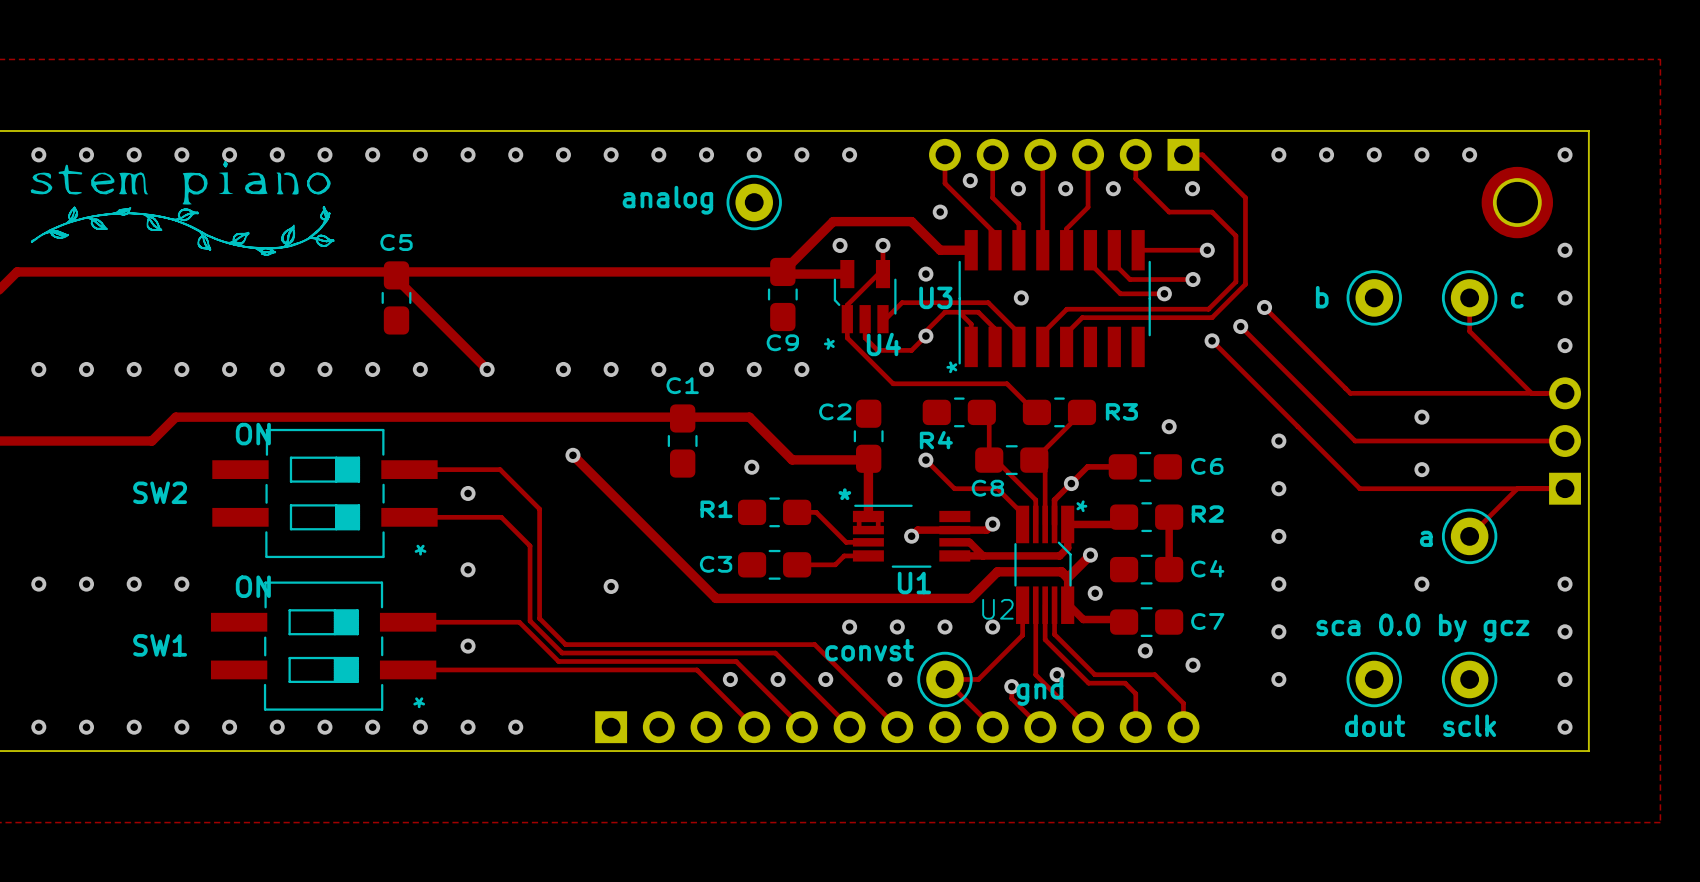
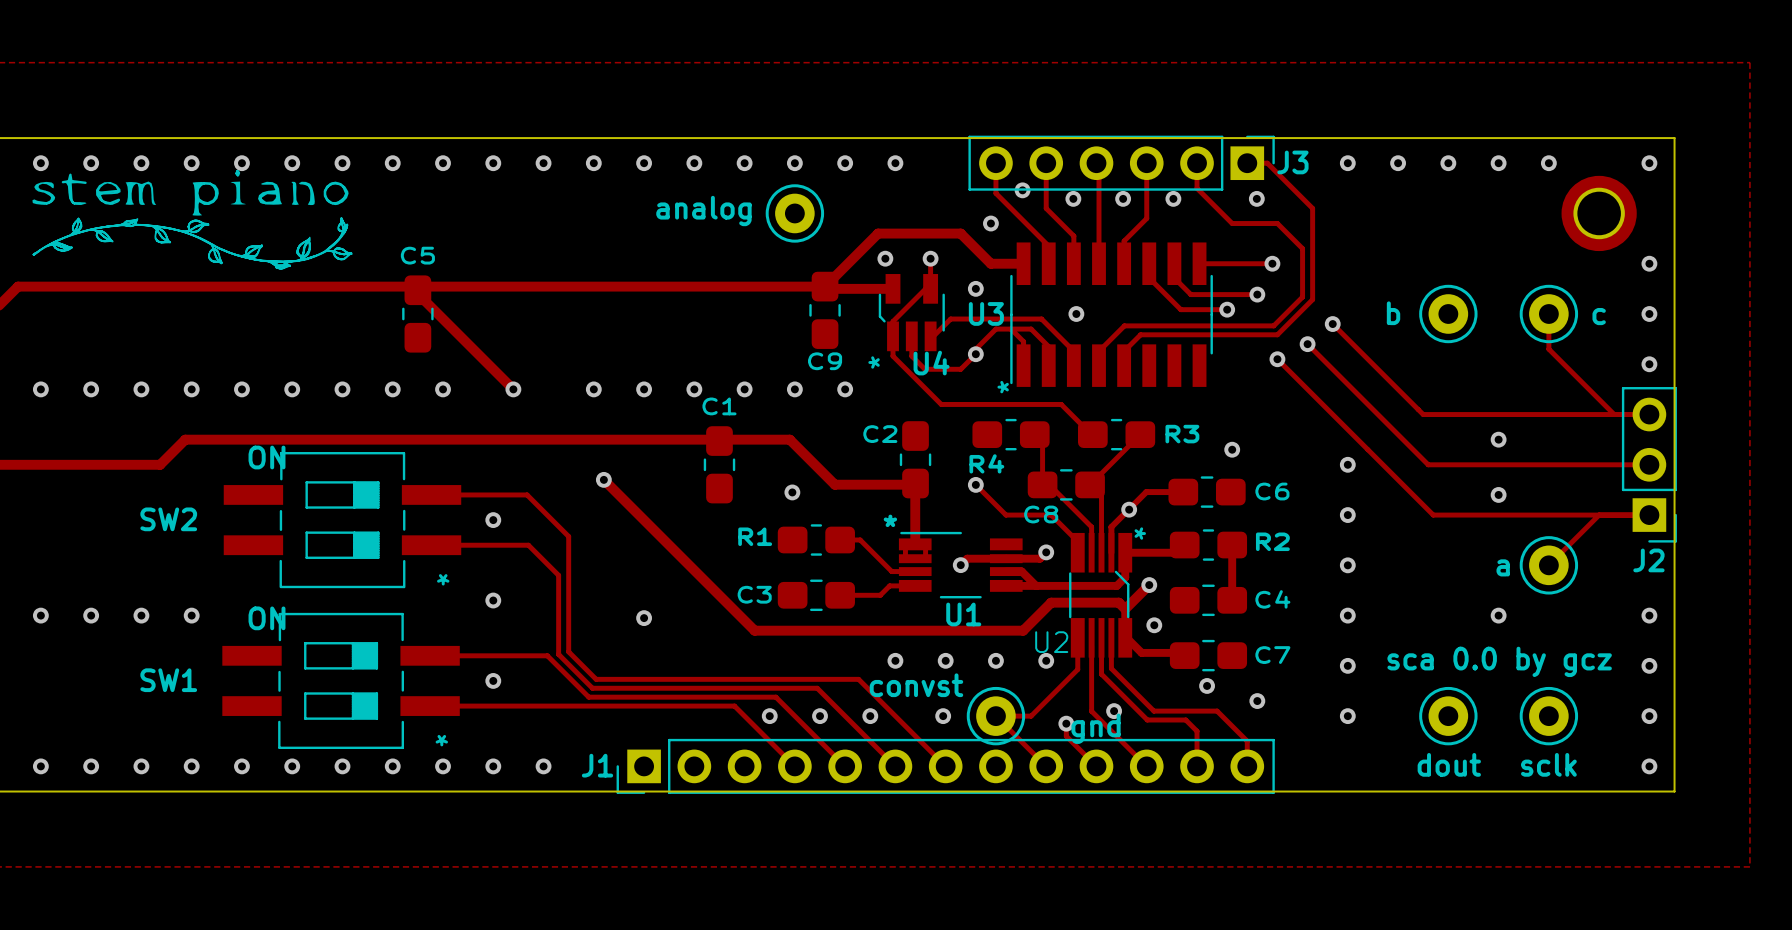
J3 side: bottom (1064, 154) -> top (1121, 163)
J2 side: bottom (1565, 441) -> top (1649, 464)
J1 side: bottom (897, 727) -> top (945, 766)

